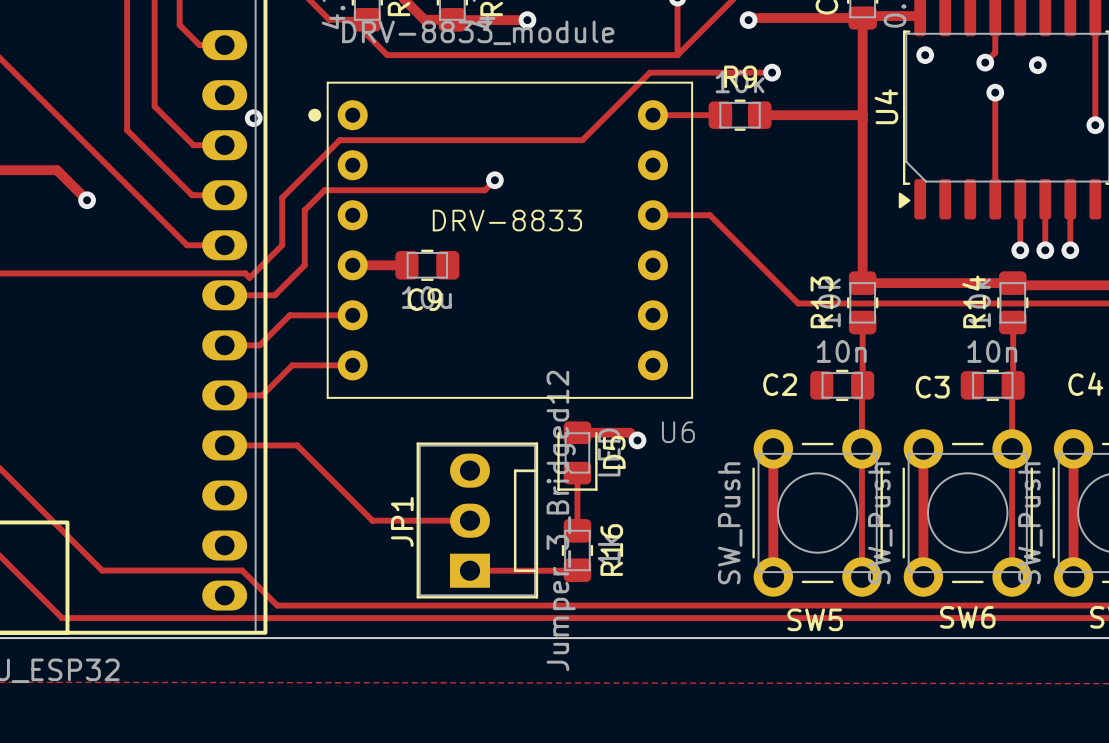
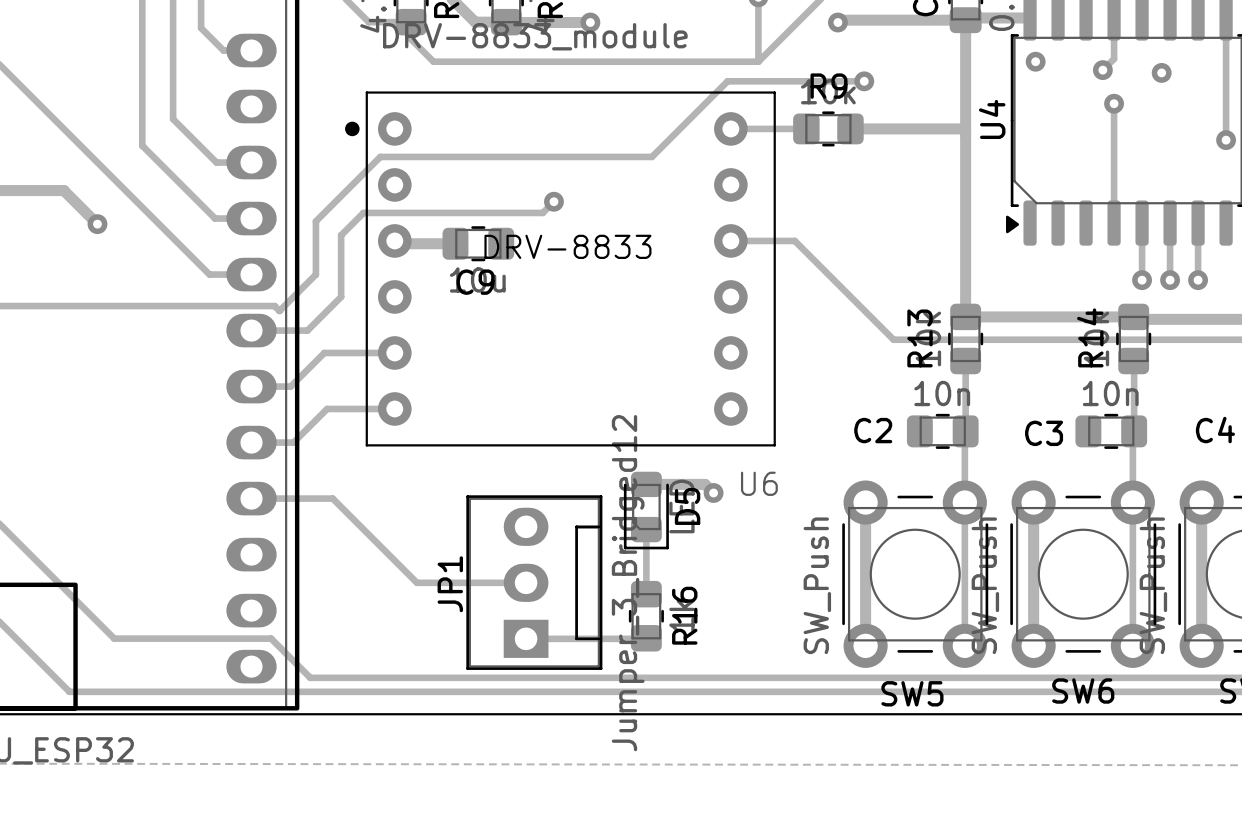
via: (253, 118) -> none
track: (352, 265) (406, 265) -> (394, 243) (455, 243)
C9 position: (427, 265) -> (478, 243)

